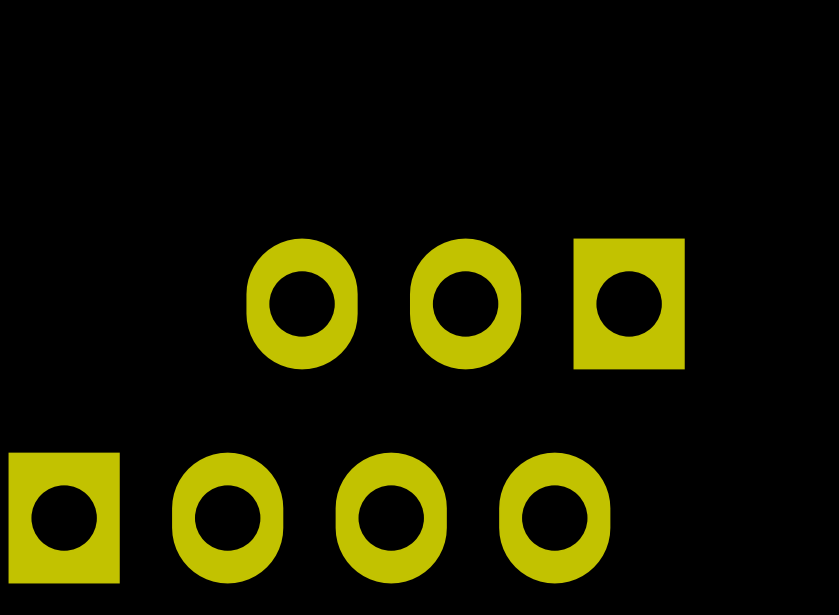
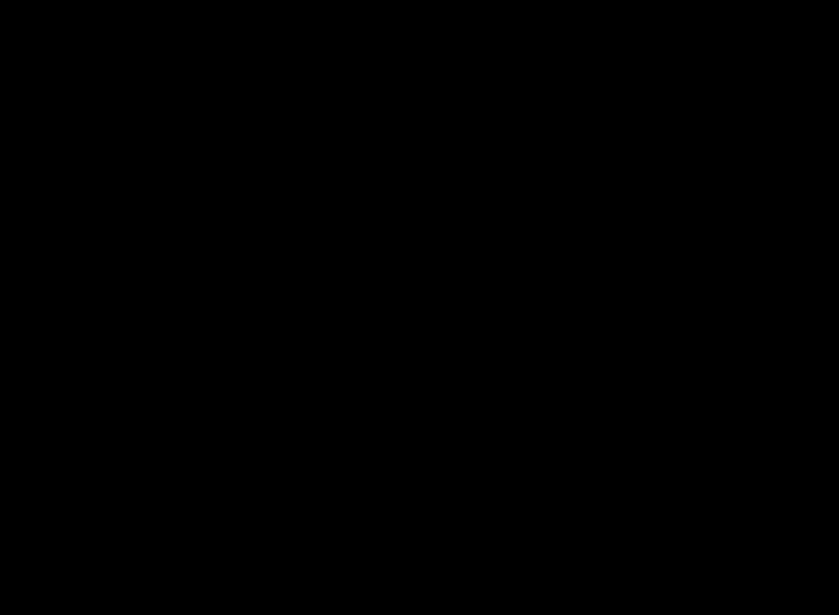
part: (465, 303) -> none
part: (309, 518) -> none

